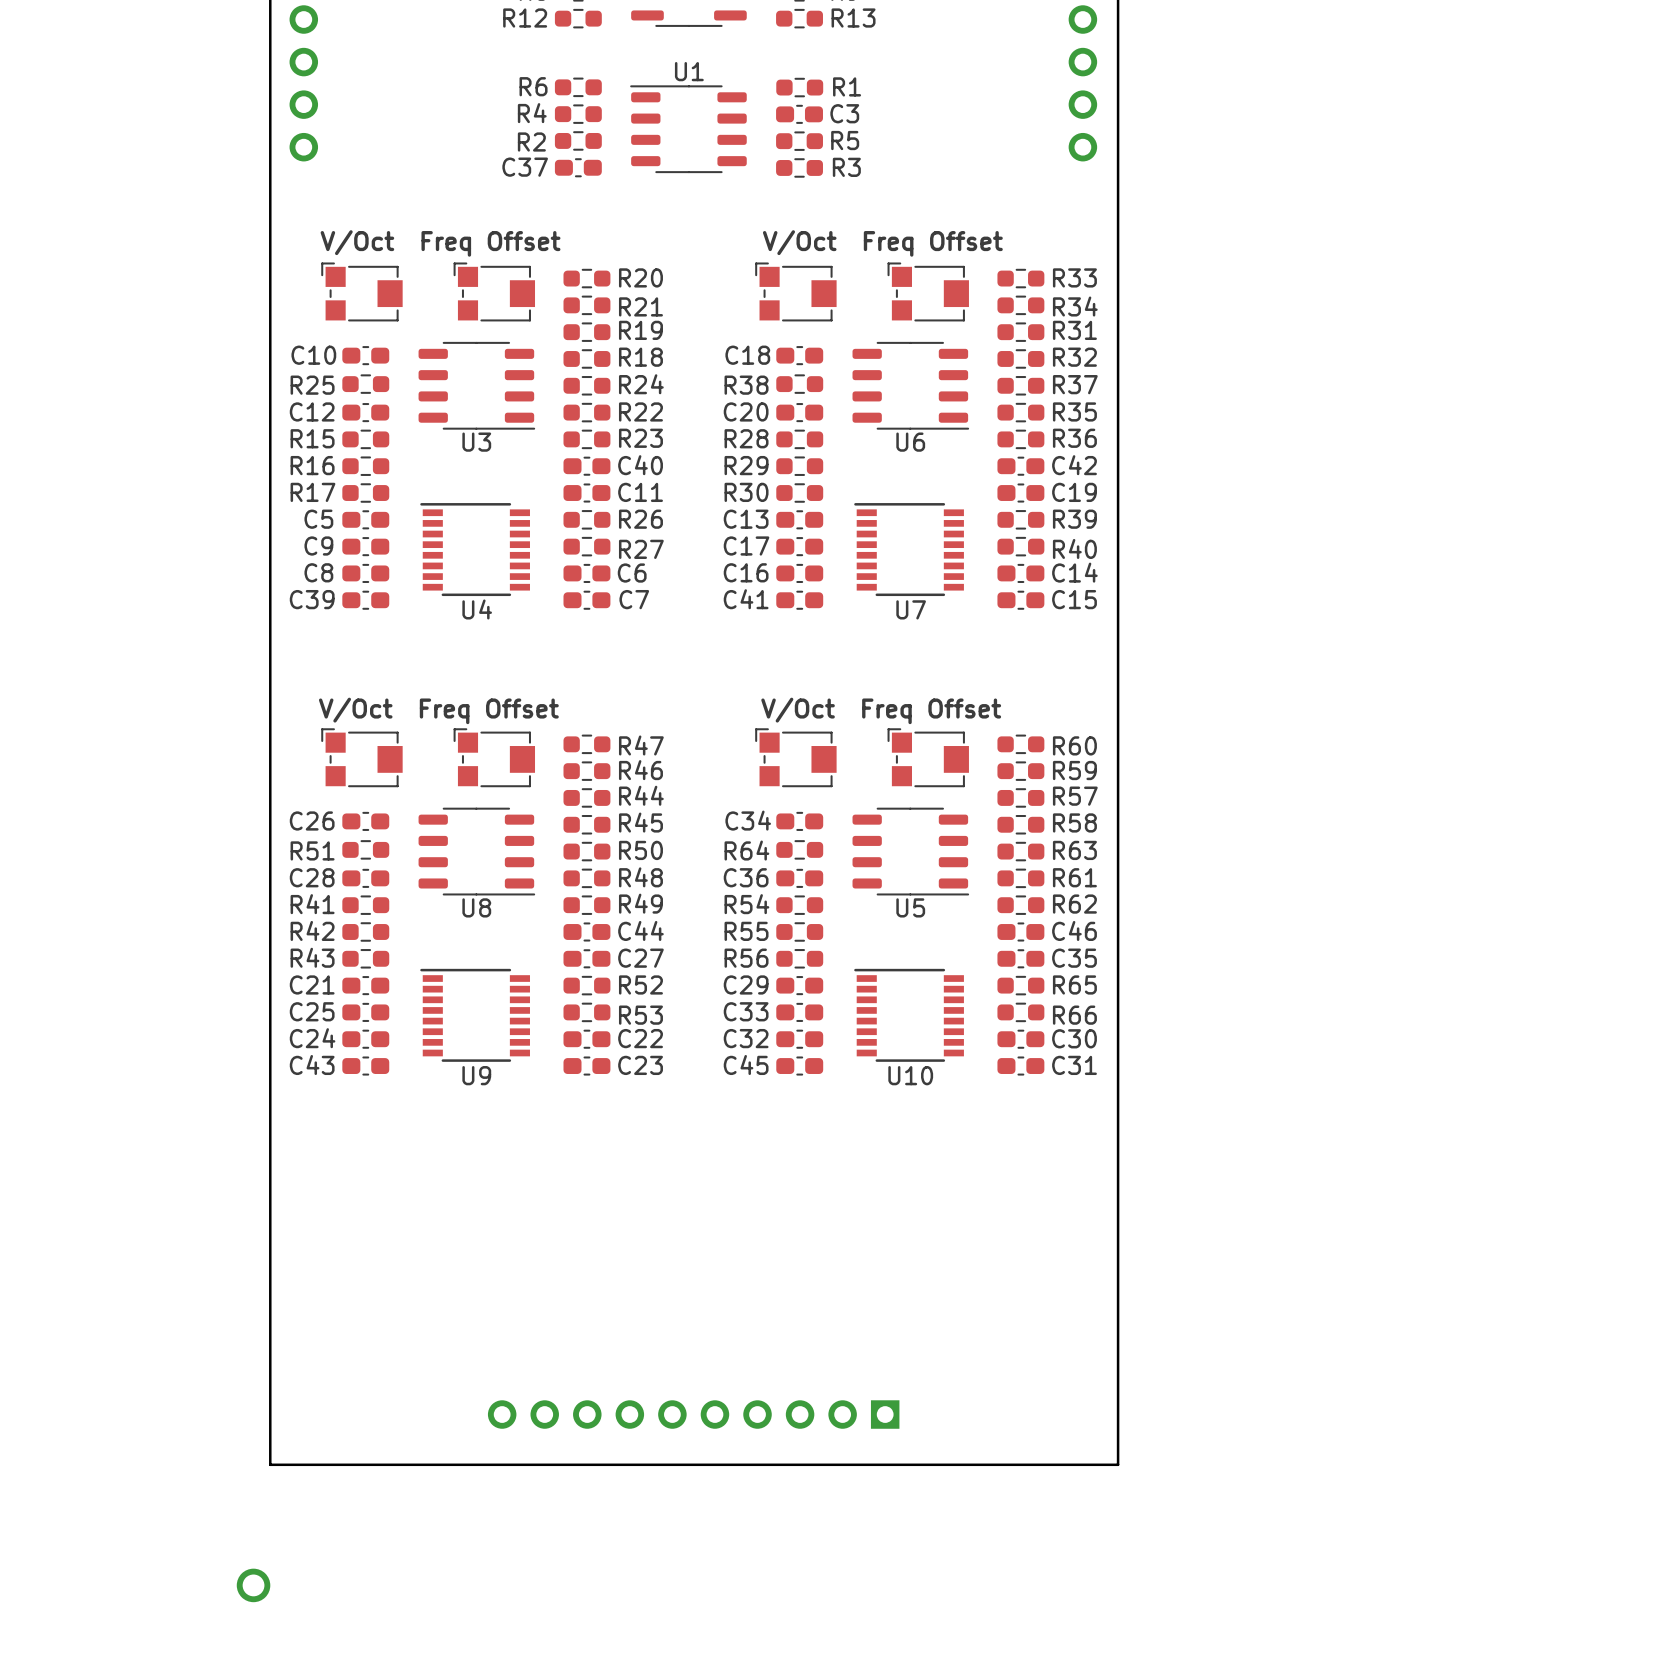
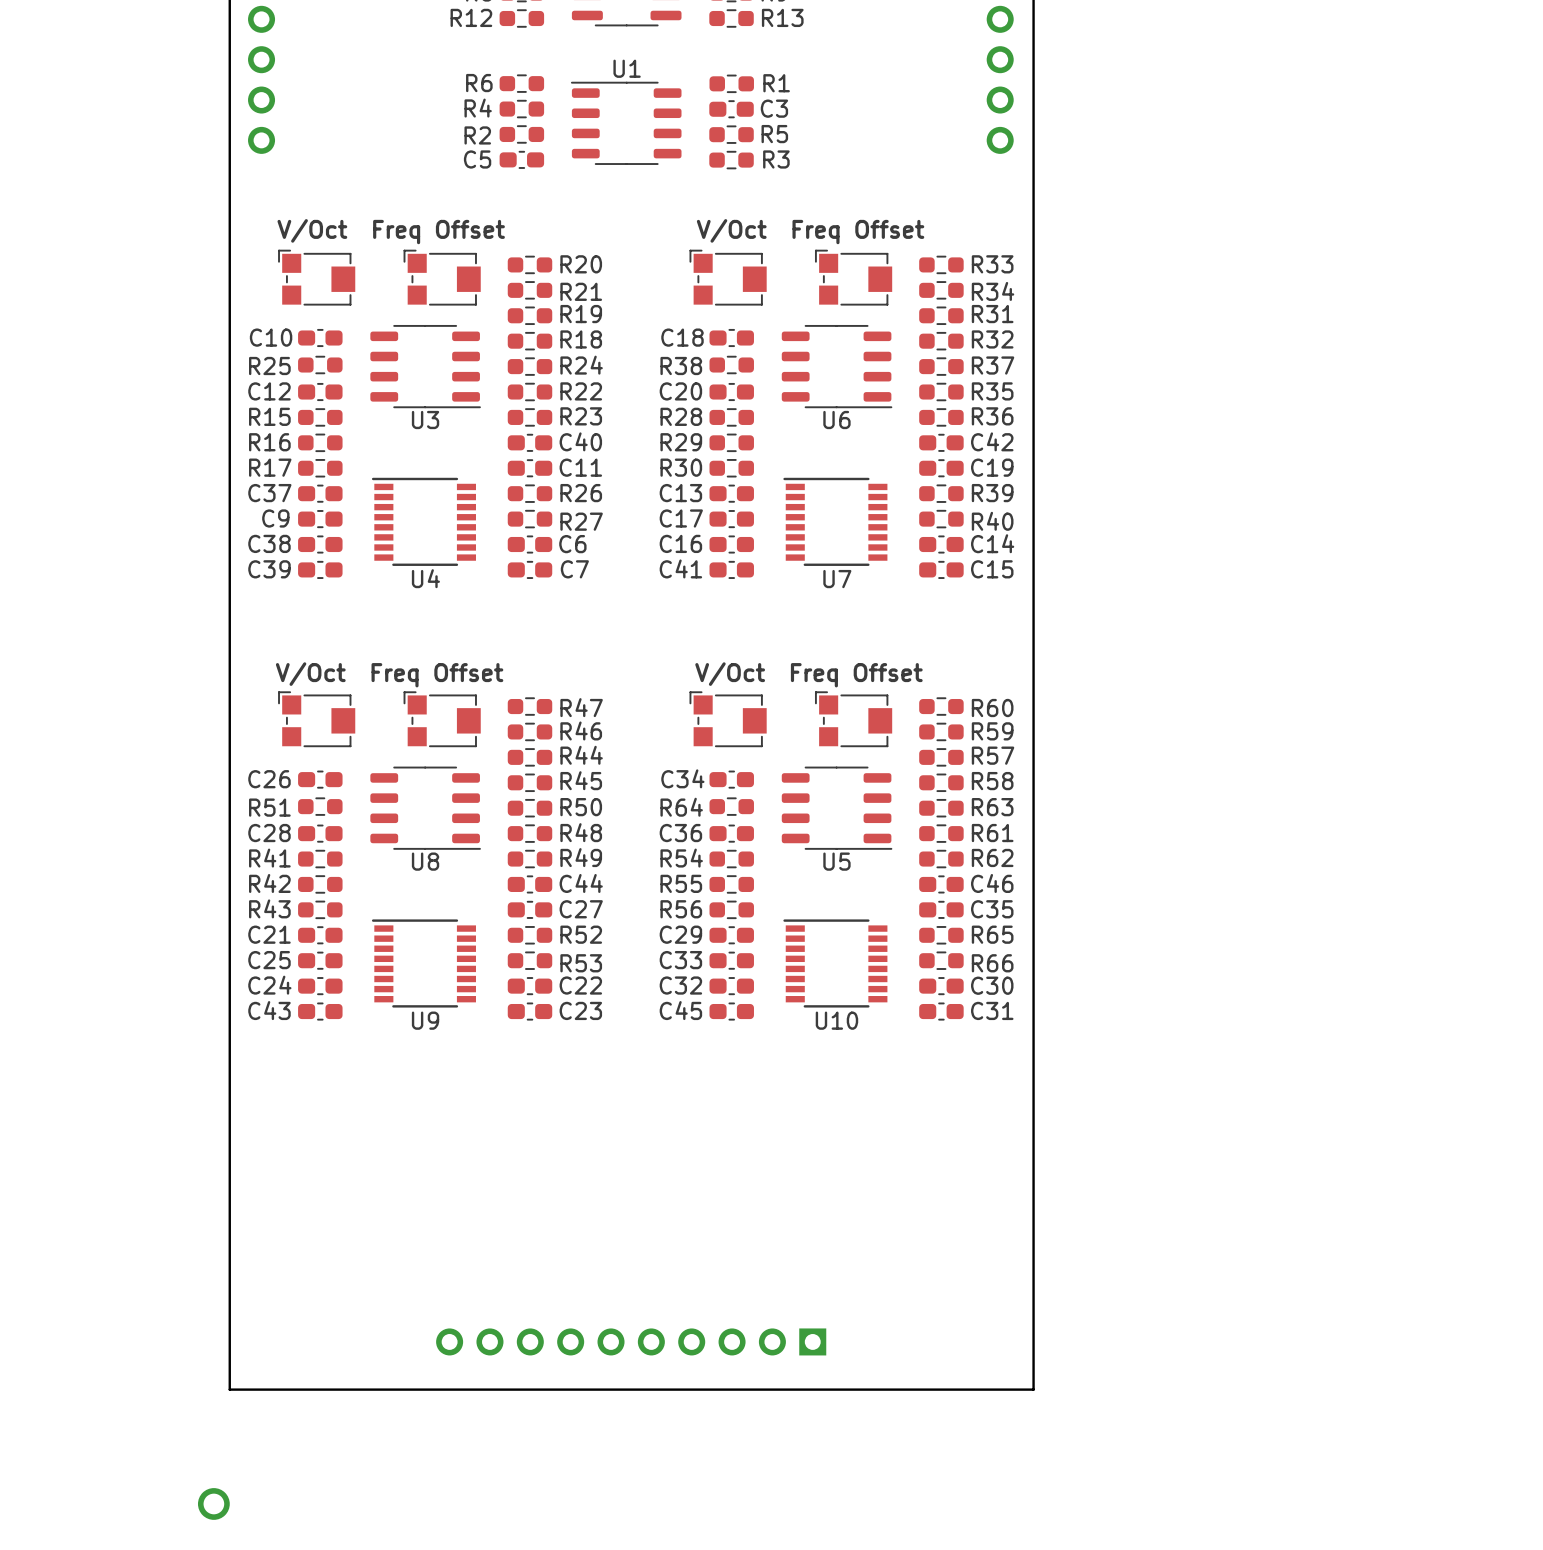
C37 name: C37 (525, 167) -> C5 (477, 159)
C5 name: C5 (318, 519) -> C37 (269, 493)
C8 name: C8 (318, 572) -> C38 (269, 543)

